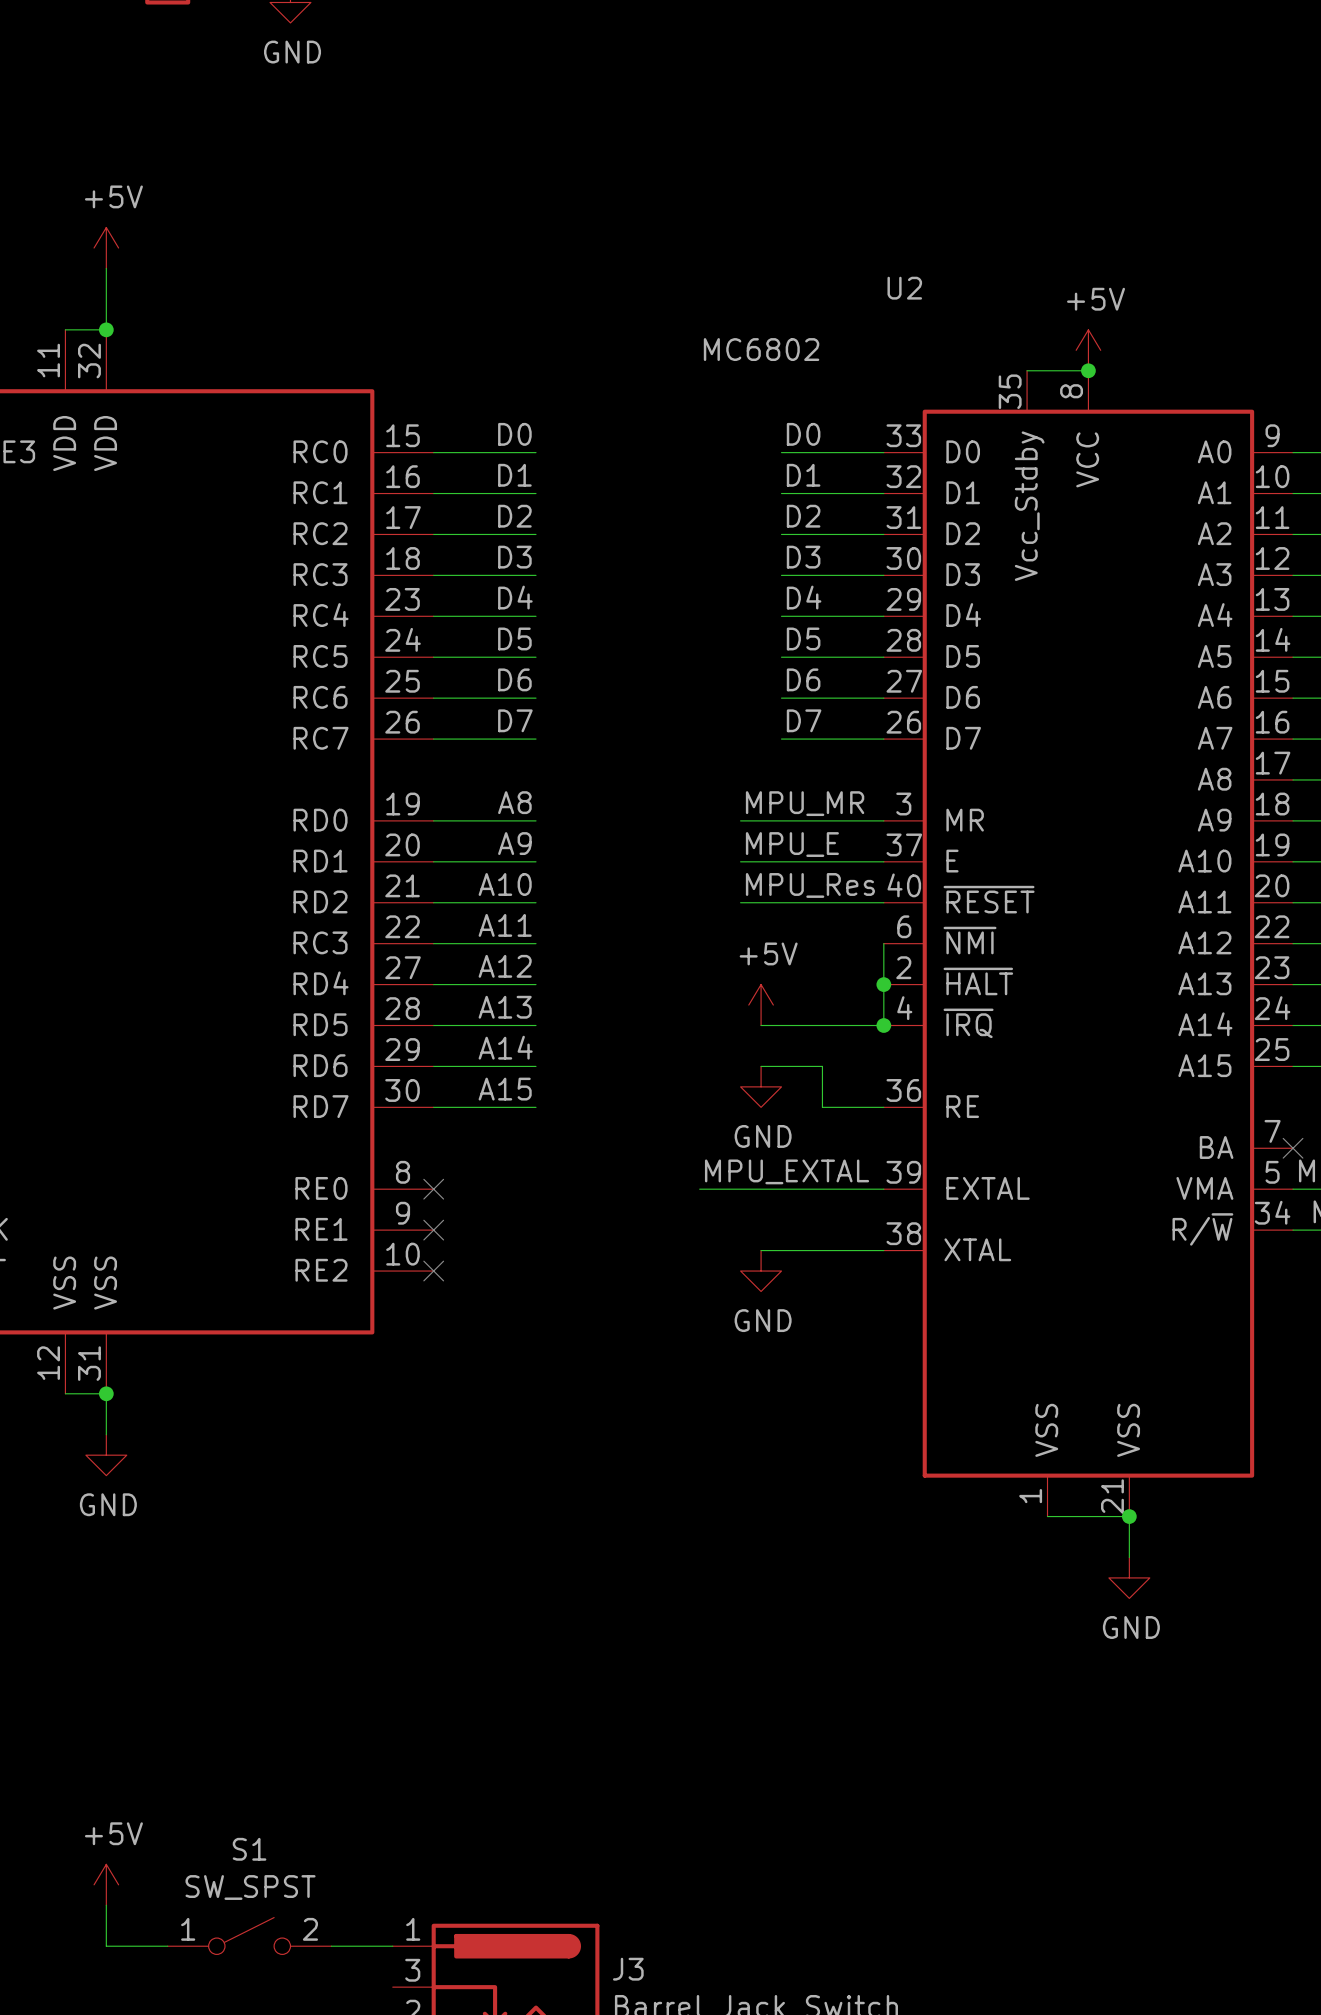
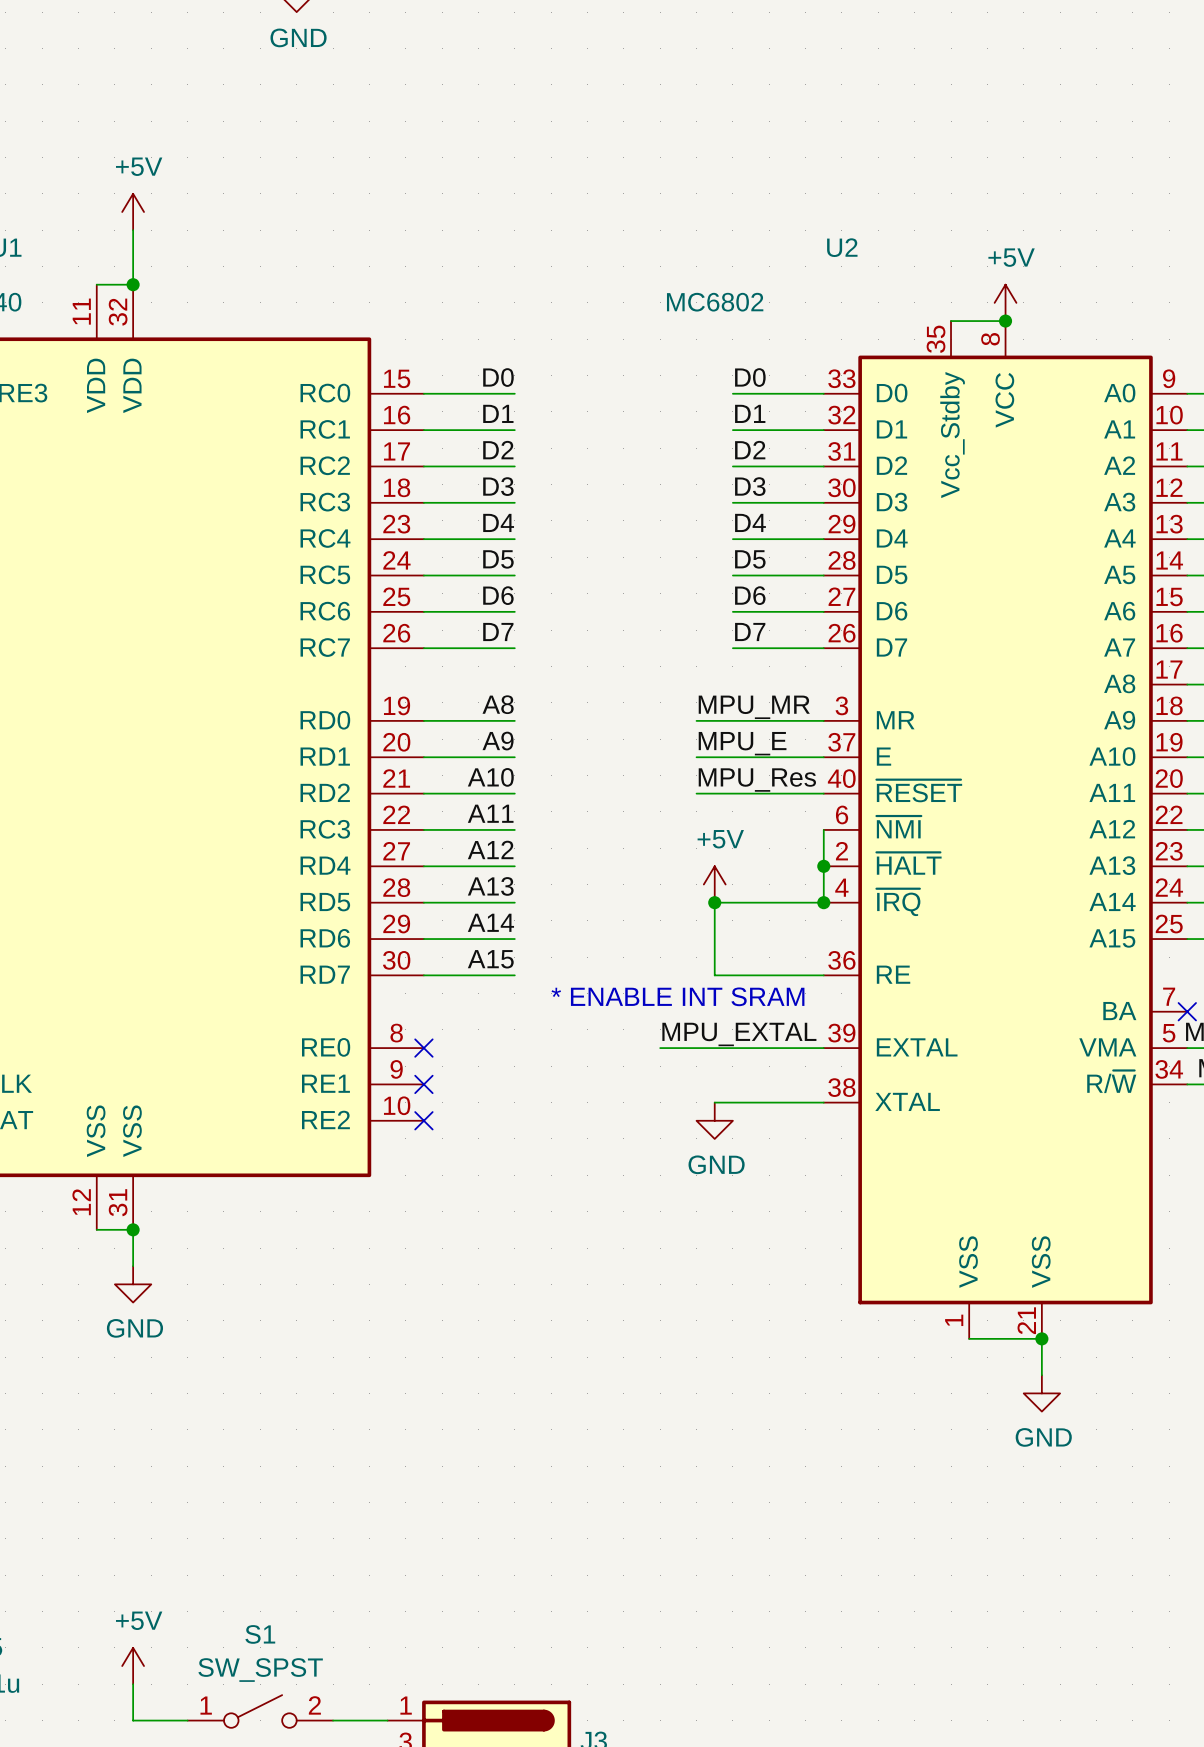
junction: none -> (714, 902)
wire: (761, 1066) (822, 1066) (822, 1107) -> (714, 902) (714, 975) (769, 975)
power symbol: GND (761, 1086) -> none
text: none -> * ENABLE INT SRAM (678, 996)

